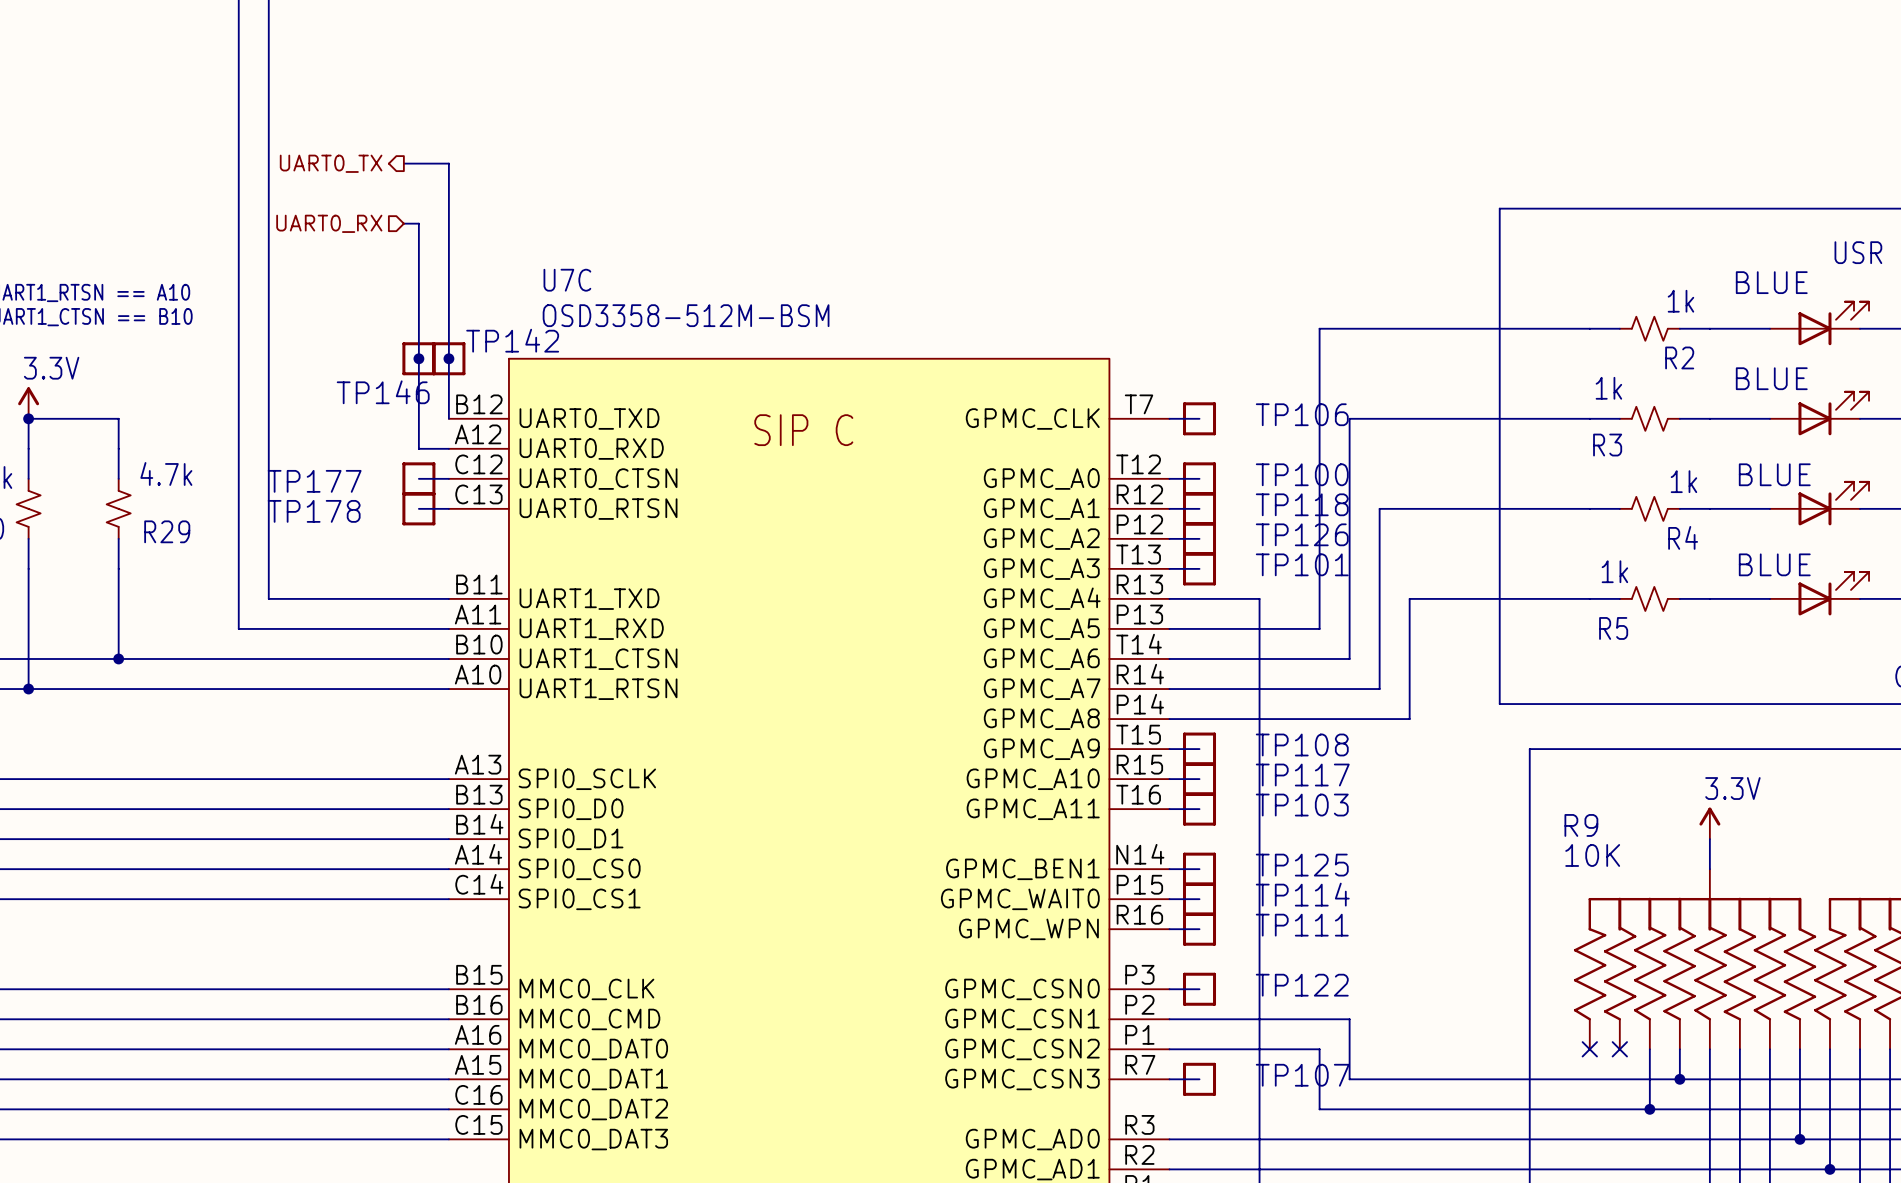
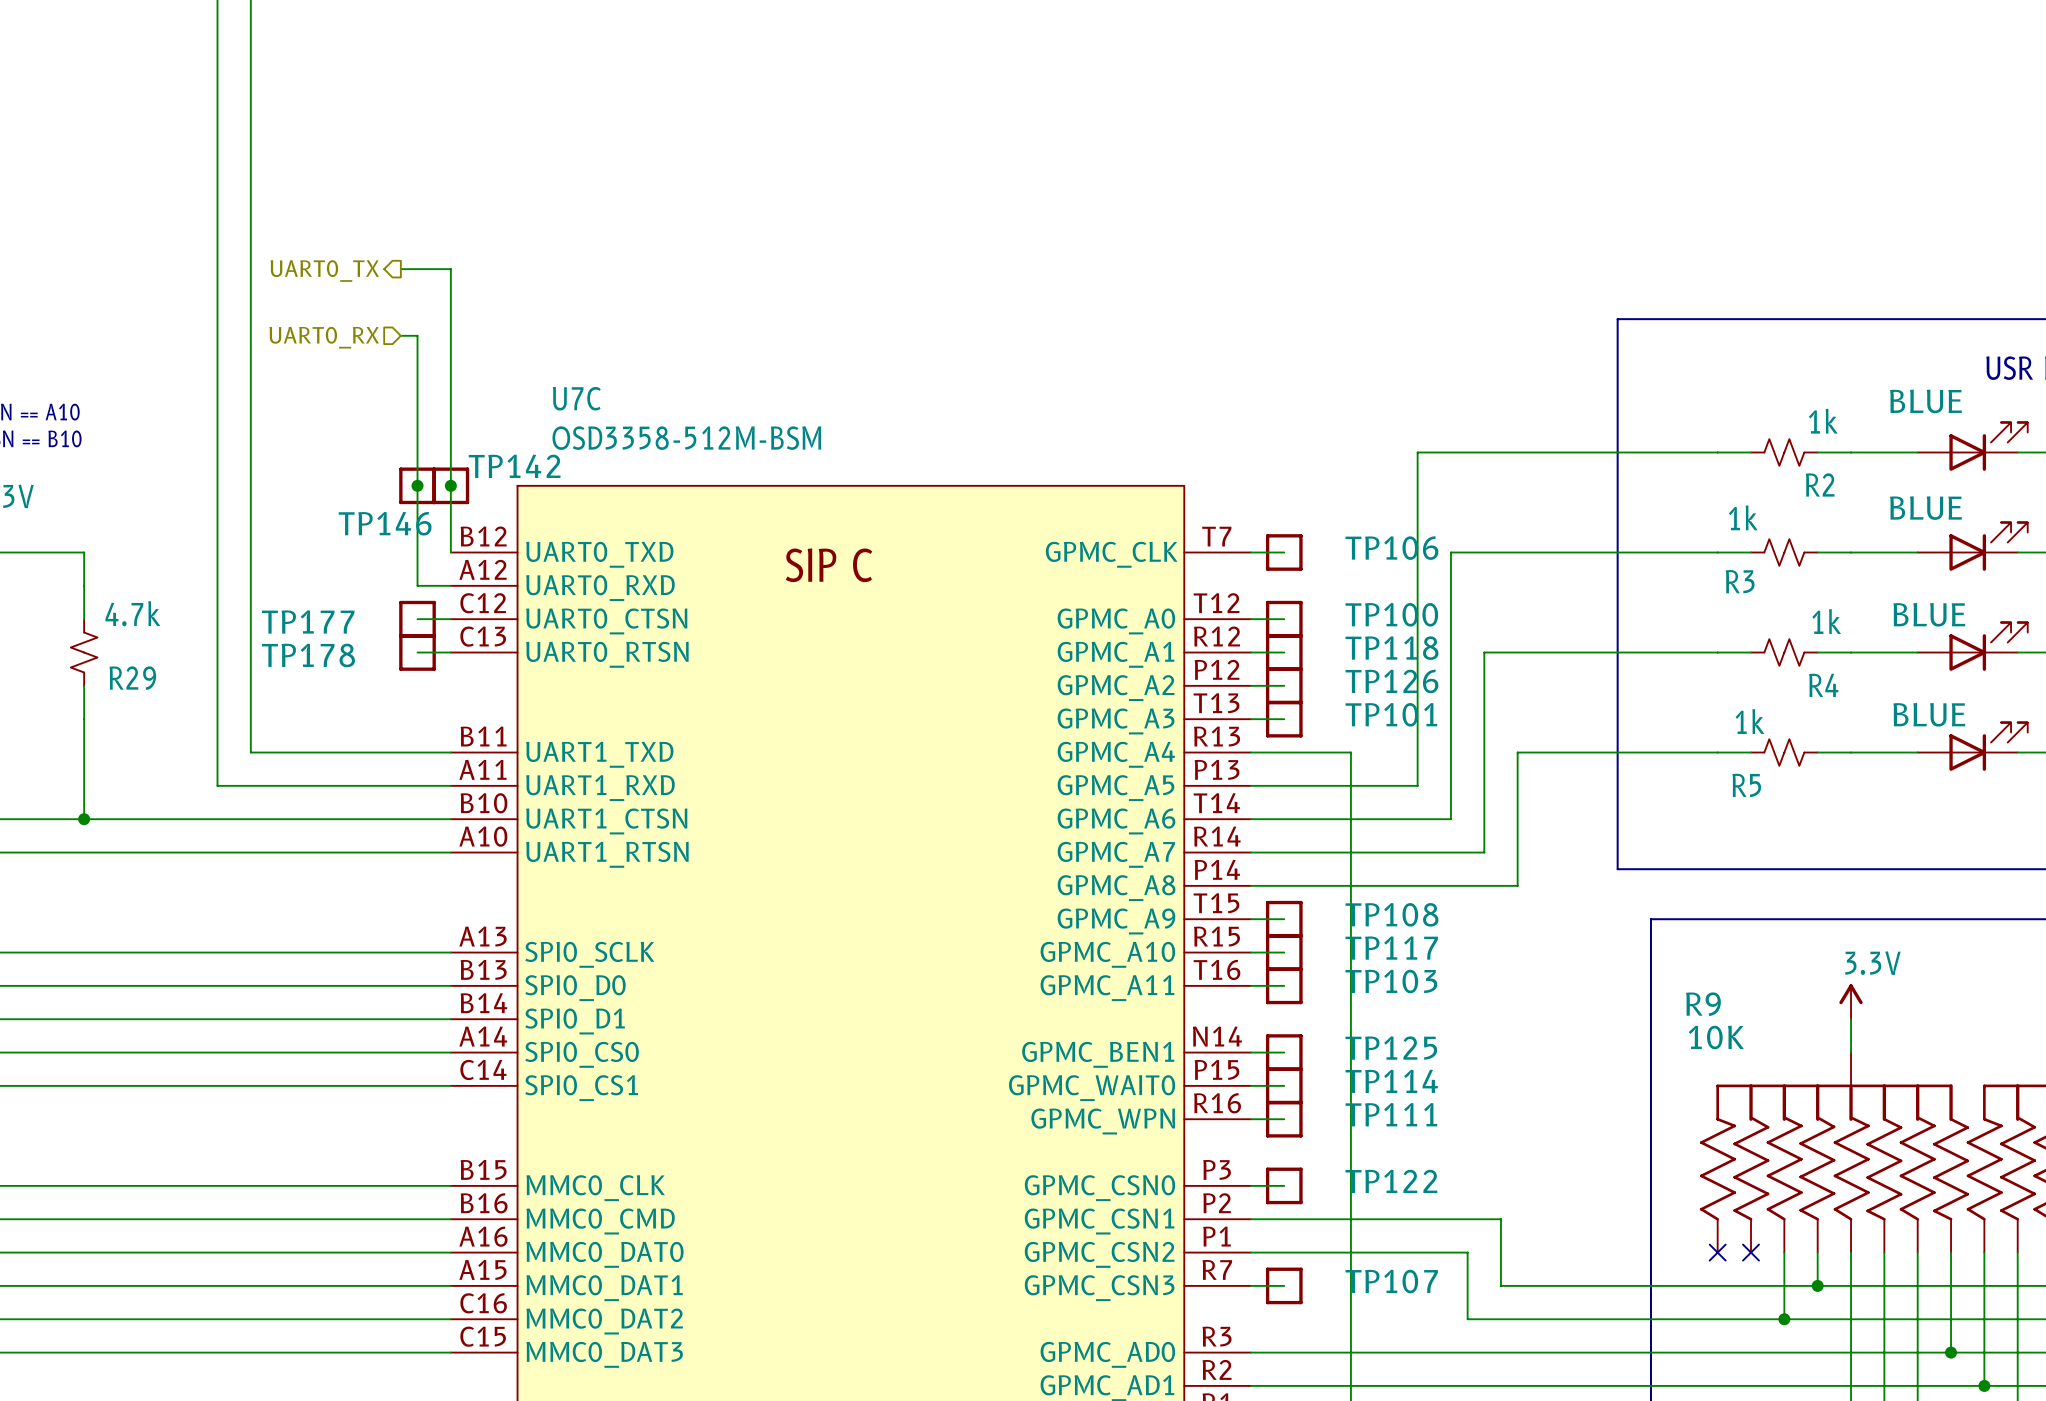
wire: (1349, 1019) (1349, 1079) (1394, 1079) -> (1450, 1219) (1500, 1219) (1500, 1285)
wire: (1319, 1049) (1319, 1109) (1364, 1109) -> (1417, 1252) (1467, 1252) (1467, 1319)

